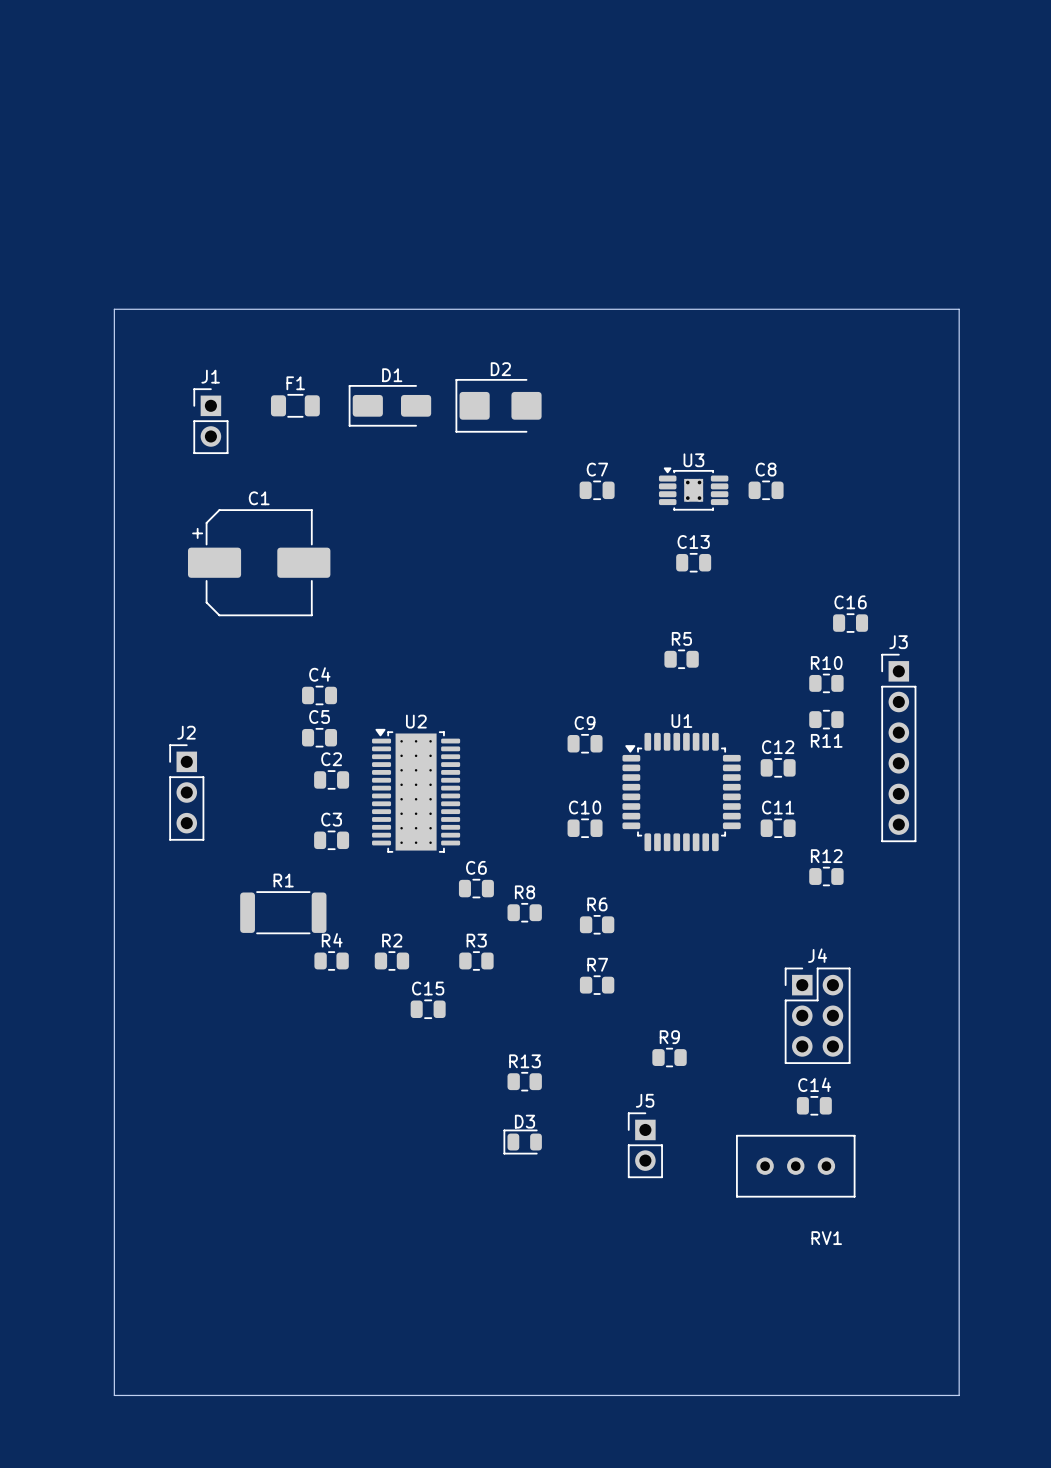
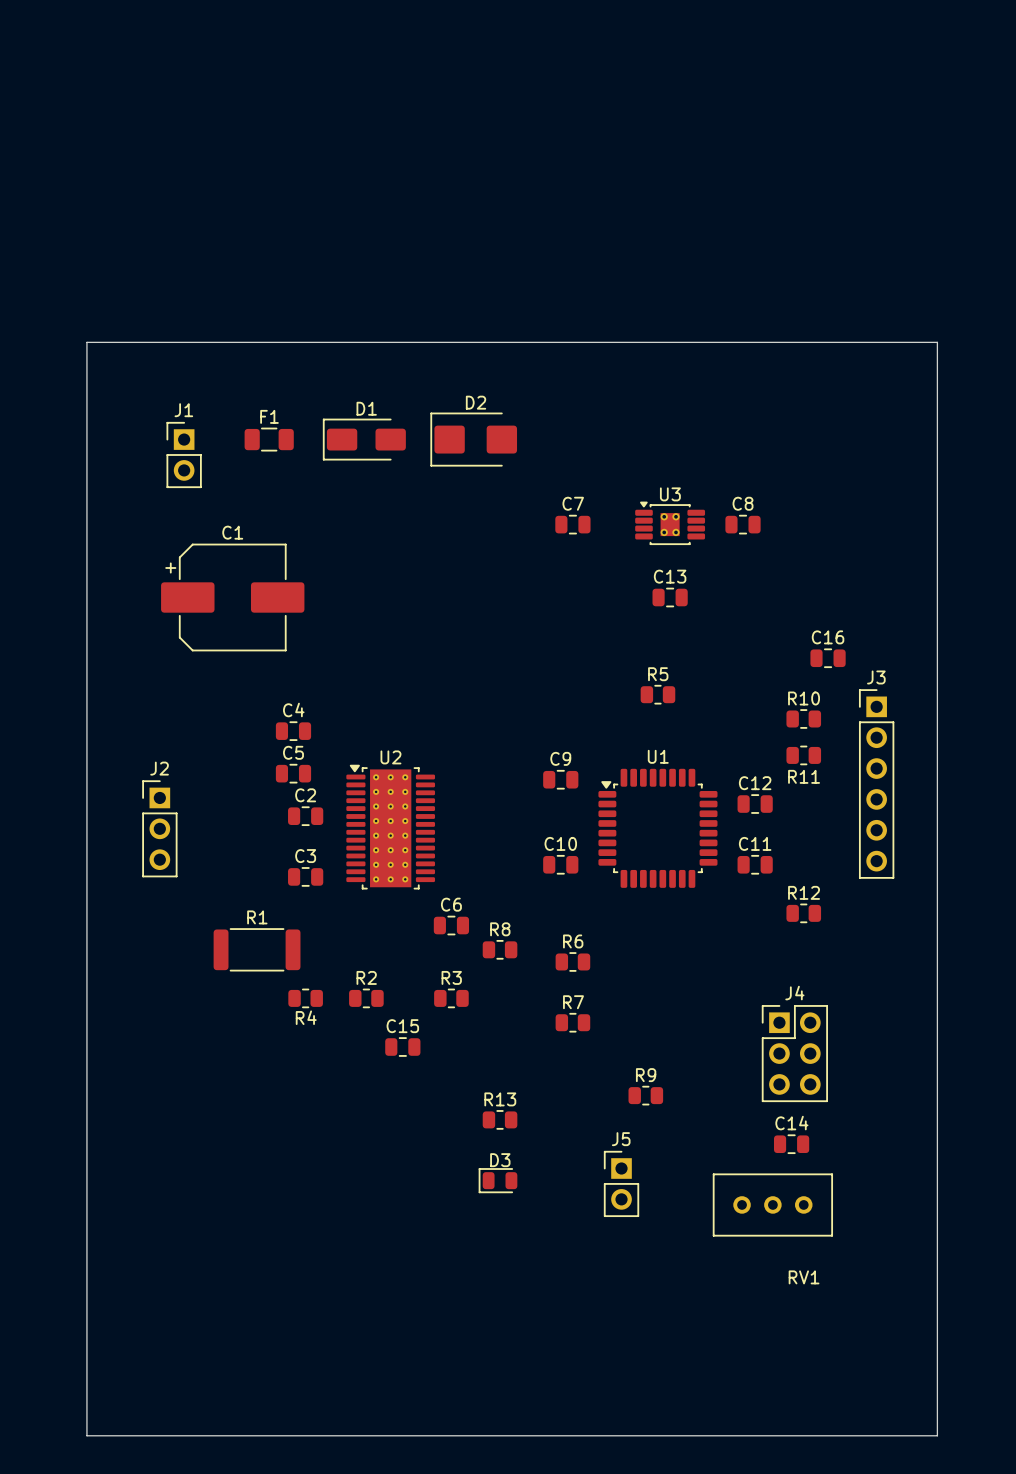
R4 name position: R4 (332, 940) -> R4 (306, 1017)

